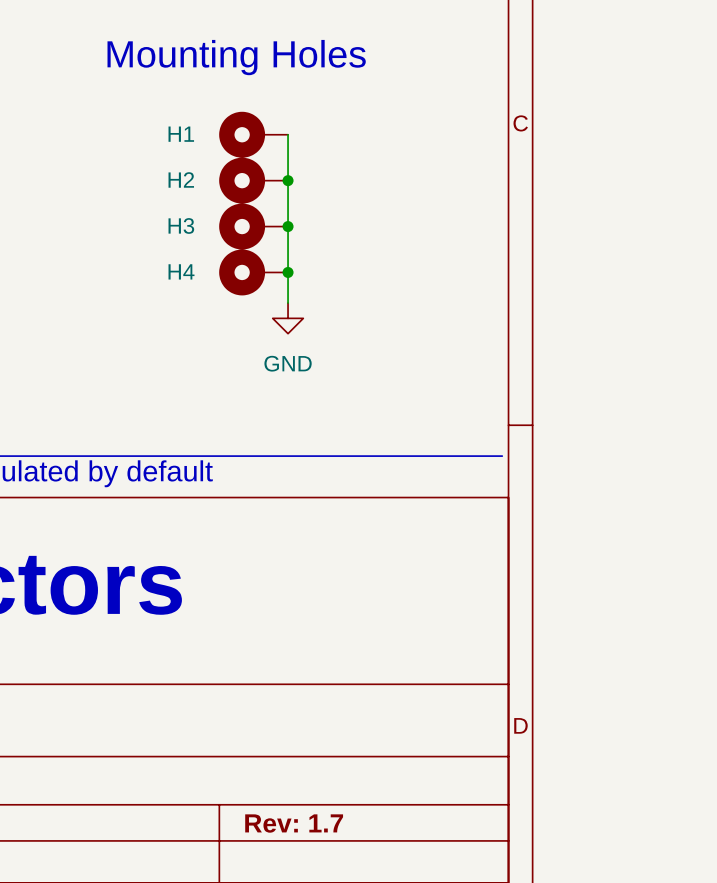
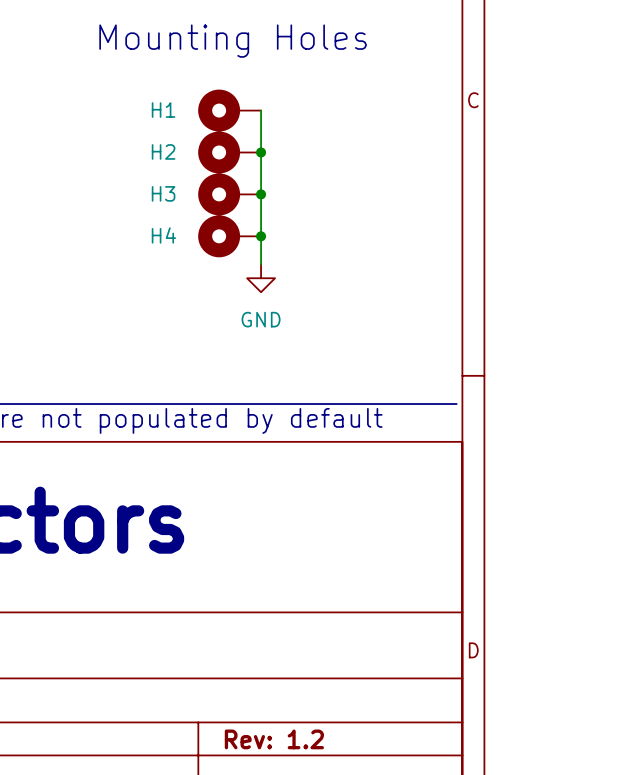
title block: Rev: 1.7 (294, 823) -> Rev: 1.2 (274, 739)

